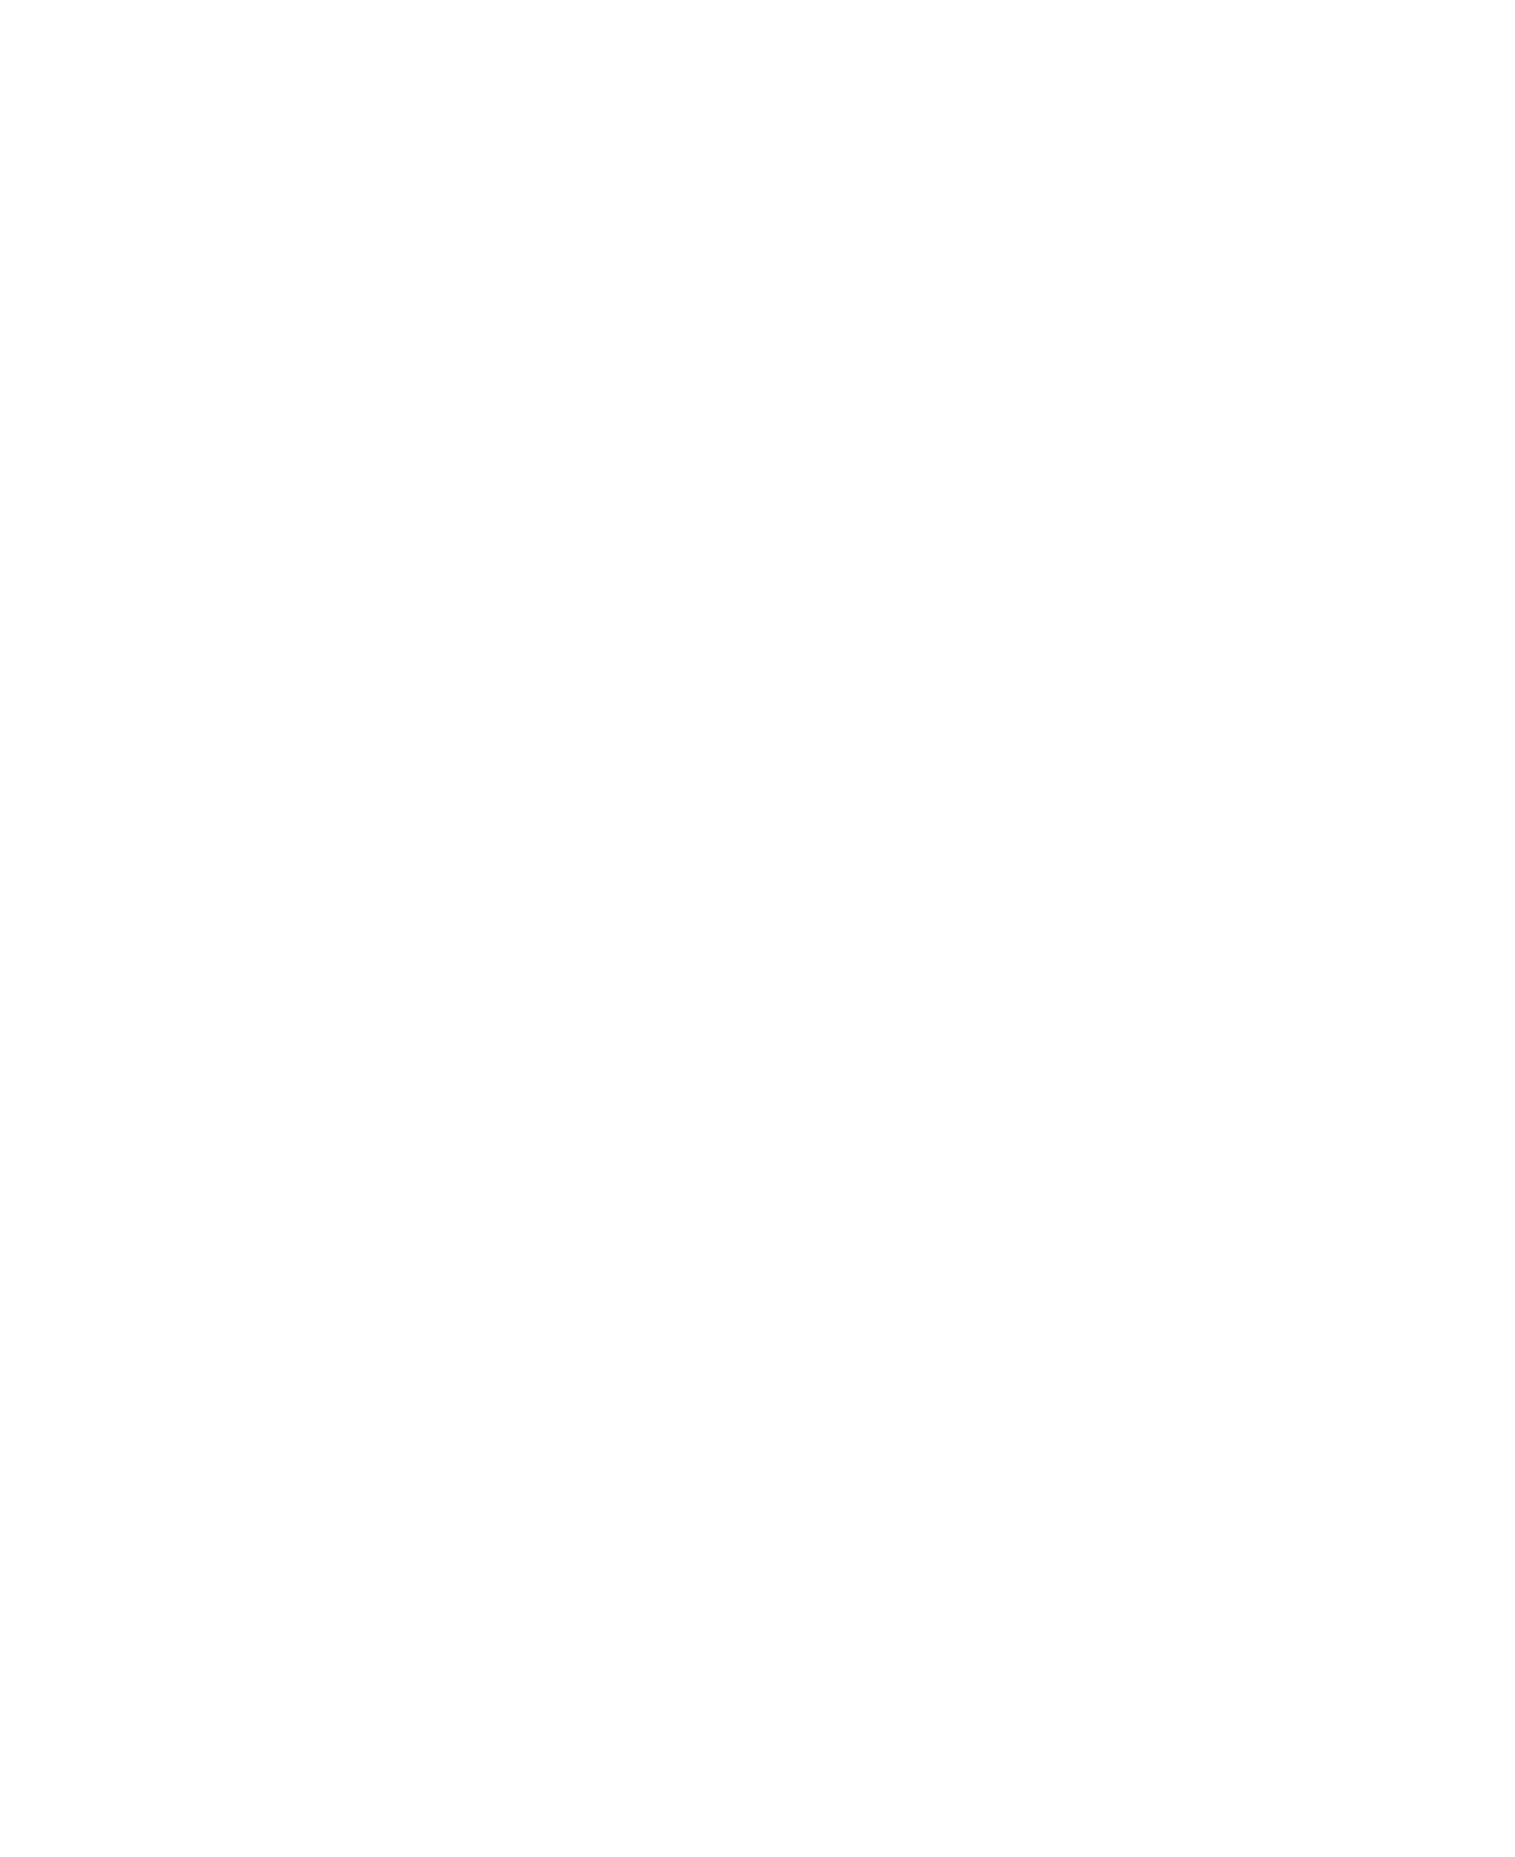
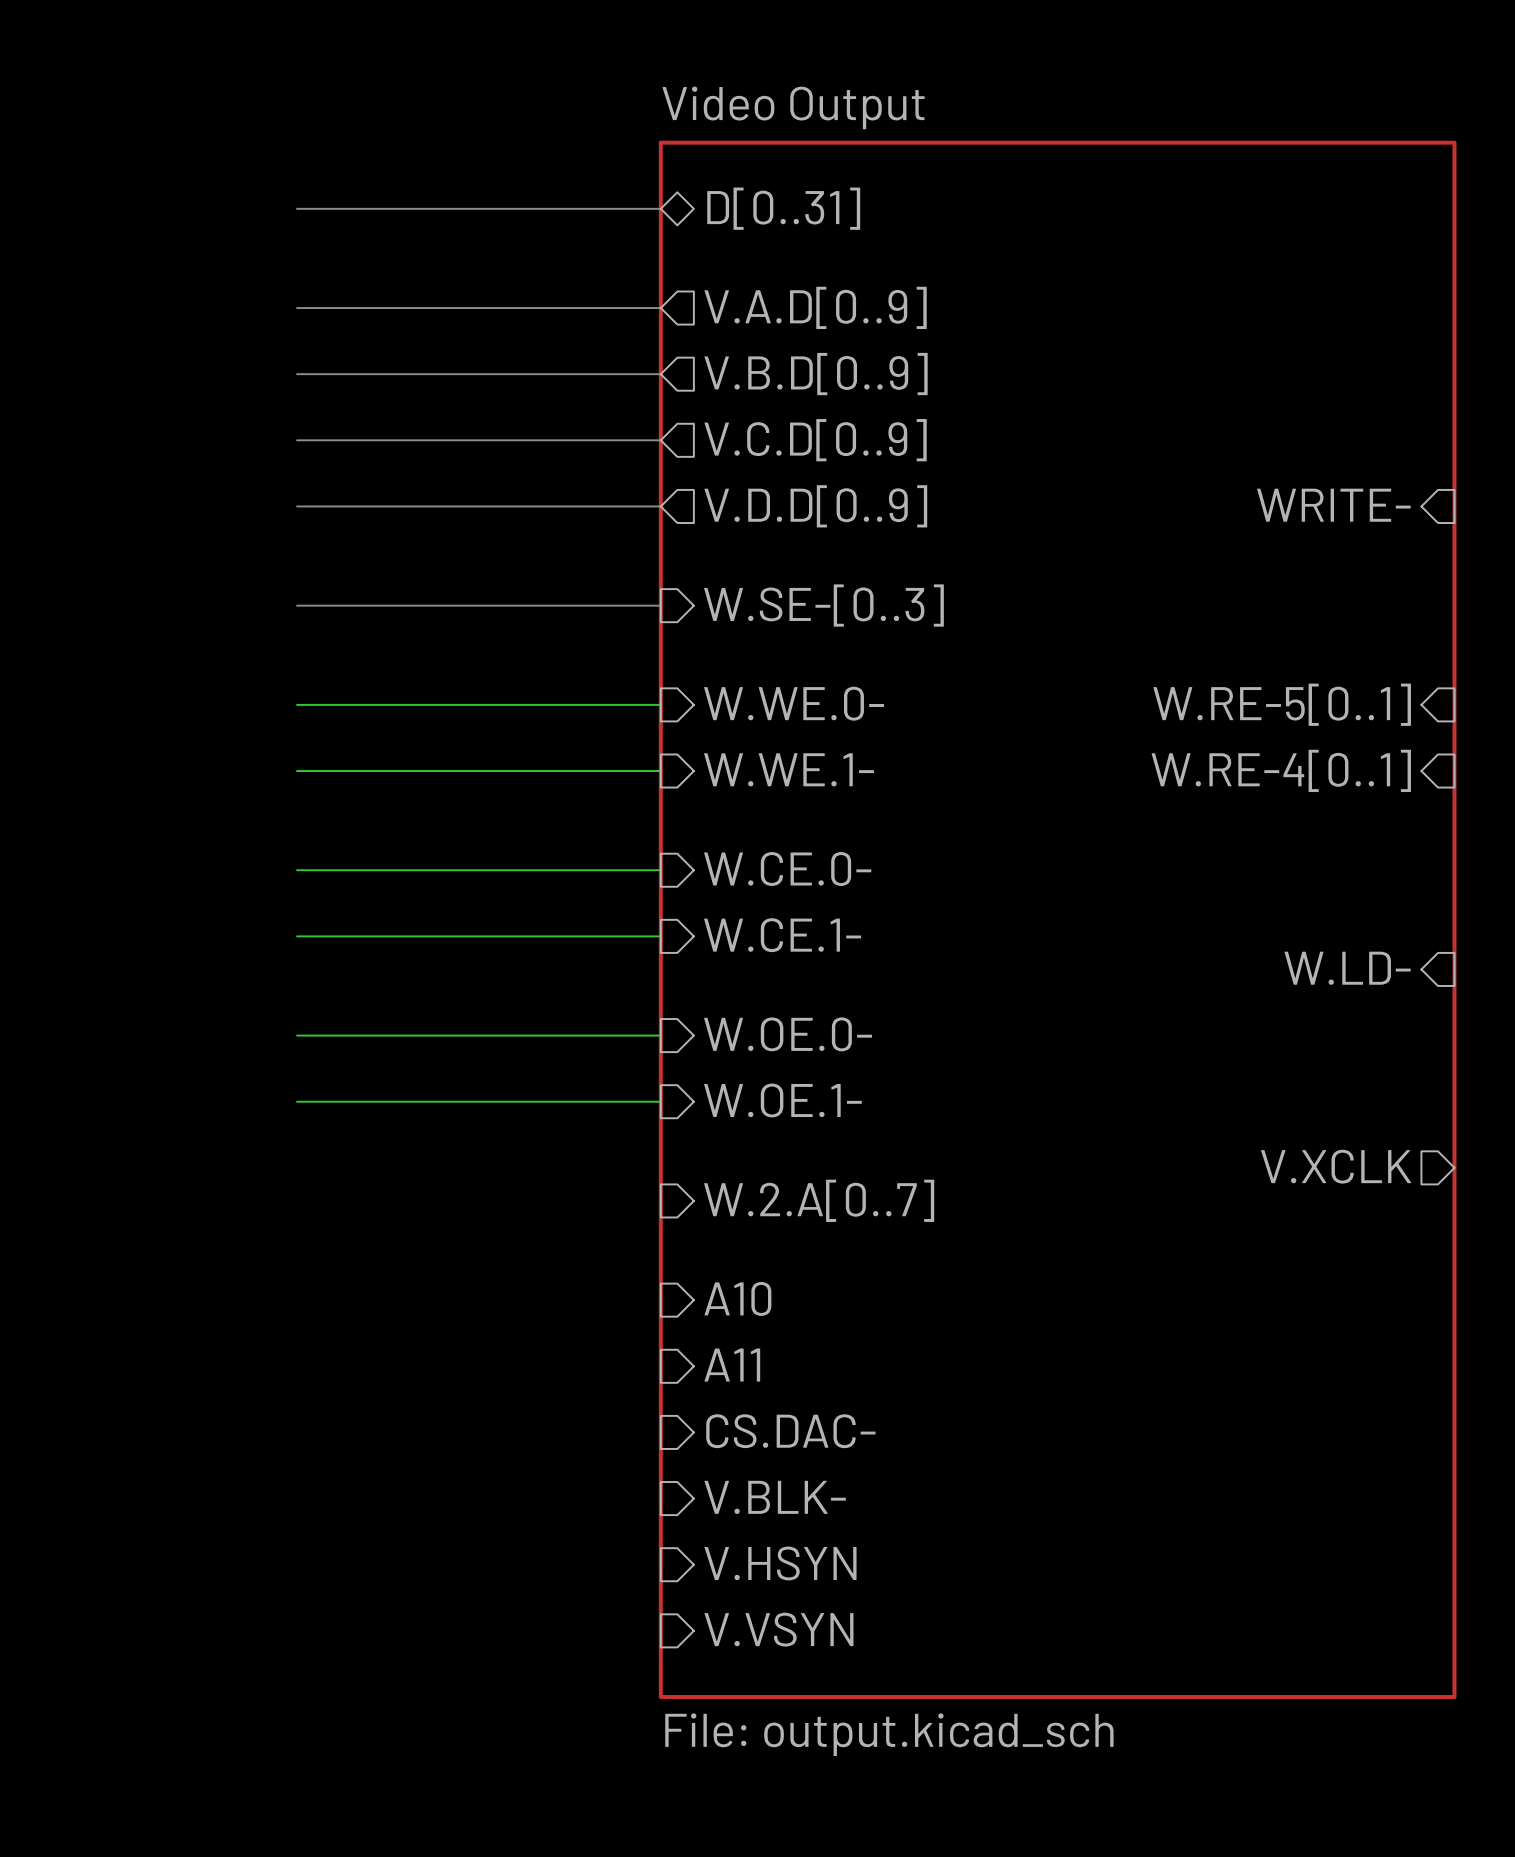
bus: none -> (297, 208) (660, 208)
sheet pin: none -> D[0..31] (783, 208)
bus: none -> (297, 308) (660, 308)
sheet pin: none -> V.A.D[0..9] (815, 307)
bus: none -> (297, 374) (660, 374)
sheet pin: none -> V.B.D[0..9] (816, 374)
bus: none -> (297, 440) (660, 440)
sheet pin: none -> V.C.D[0..9] (815, 440)
sheet pin: none -> WRITE- (1333, 505)
bus: none -> (297, 506) (660, 506)
sheet pin: none -> V.D.D[0..9] (815, 506)
bus: none -> (297, 605) (660, 605)
sheet pin: none -> W.SE-[0..3] (823, 605)
sheet pin: none -> W.WE.0- (794, 703)
wire: none -> (297, 704) (660, 704)
sheet pin: none -> W.RE-5[0..1] (1282, 704)
sheet pin: none -> W.WE.1- (789, 769)
wire: none -> (297, 771) (660, 771)
sheet pin: none -> W.RE-4[0..1] (1281, 770)
sheet pin: none -> W.CE.0- (787, 869)
wire: none -> (297, 870) (660, 870)
sheet Video Output: none -> File: output.kicad_sch (1057, 919)
sheet pin: none -> W.CE.1- (782, 935)
wire: none -> (297, 936) (660, 936)
sheet pin: none -> W.LD- (1347, 968)
sheet pin: none -> W.OE.0- (788, 1034)
wire: none -> (297, 1035) (660, 1035)
sheet pin: none -> W.OE.1- (782, 1100)
wire: none -> (297, 1101) (660, 1101)
sheet pin: none -> V.XCLK (1336, 1166)
sheet pin: none -> W.2.A[0..7] (819, 1200)
sheet pin: none -> A10 (737, 1298)
sheet pin: none -> A11 (732, 1365)
sheet pin: none -> CS.DAC- (790, 1431)
sheet pin: none -> V.BLK- (775, 1497)
sheet pin: none -> V.HSYN (780, 1563)
sheet pin: none -> V.VSYN (778, 1629)

